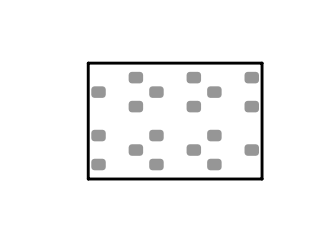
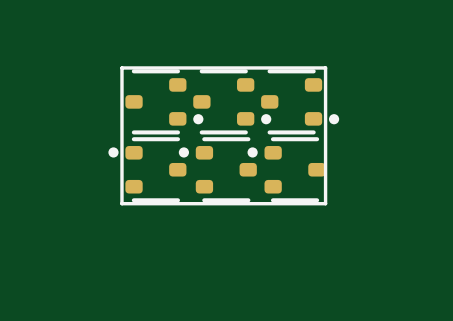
part footprint: [91, 71, 144, 113] -> [125, 69, 204, 135]
part footprint: [149, 71, 202, 113] -> [193, 69, 272, 135]
part footprint: [207, 71, 260, 113] -> [261, 69, 340, 135]
part footprint: [91, 129, 144, 171] -> [108, 137, 187, 203]
part footprint: [149, 129, 202, 171] -> [178, 137, 257, 203]
part footprint: [207, 129, 260, 171] -> [247, 137, 326, 203]

